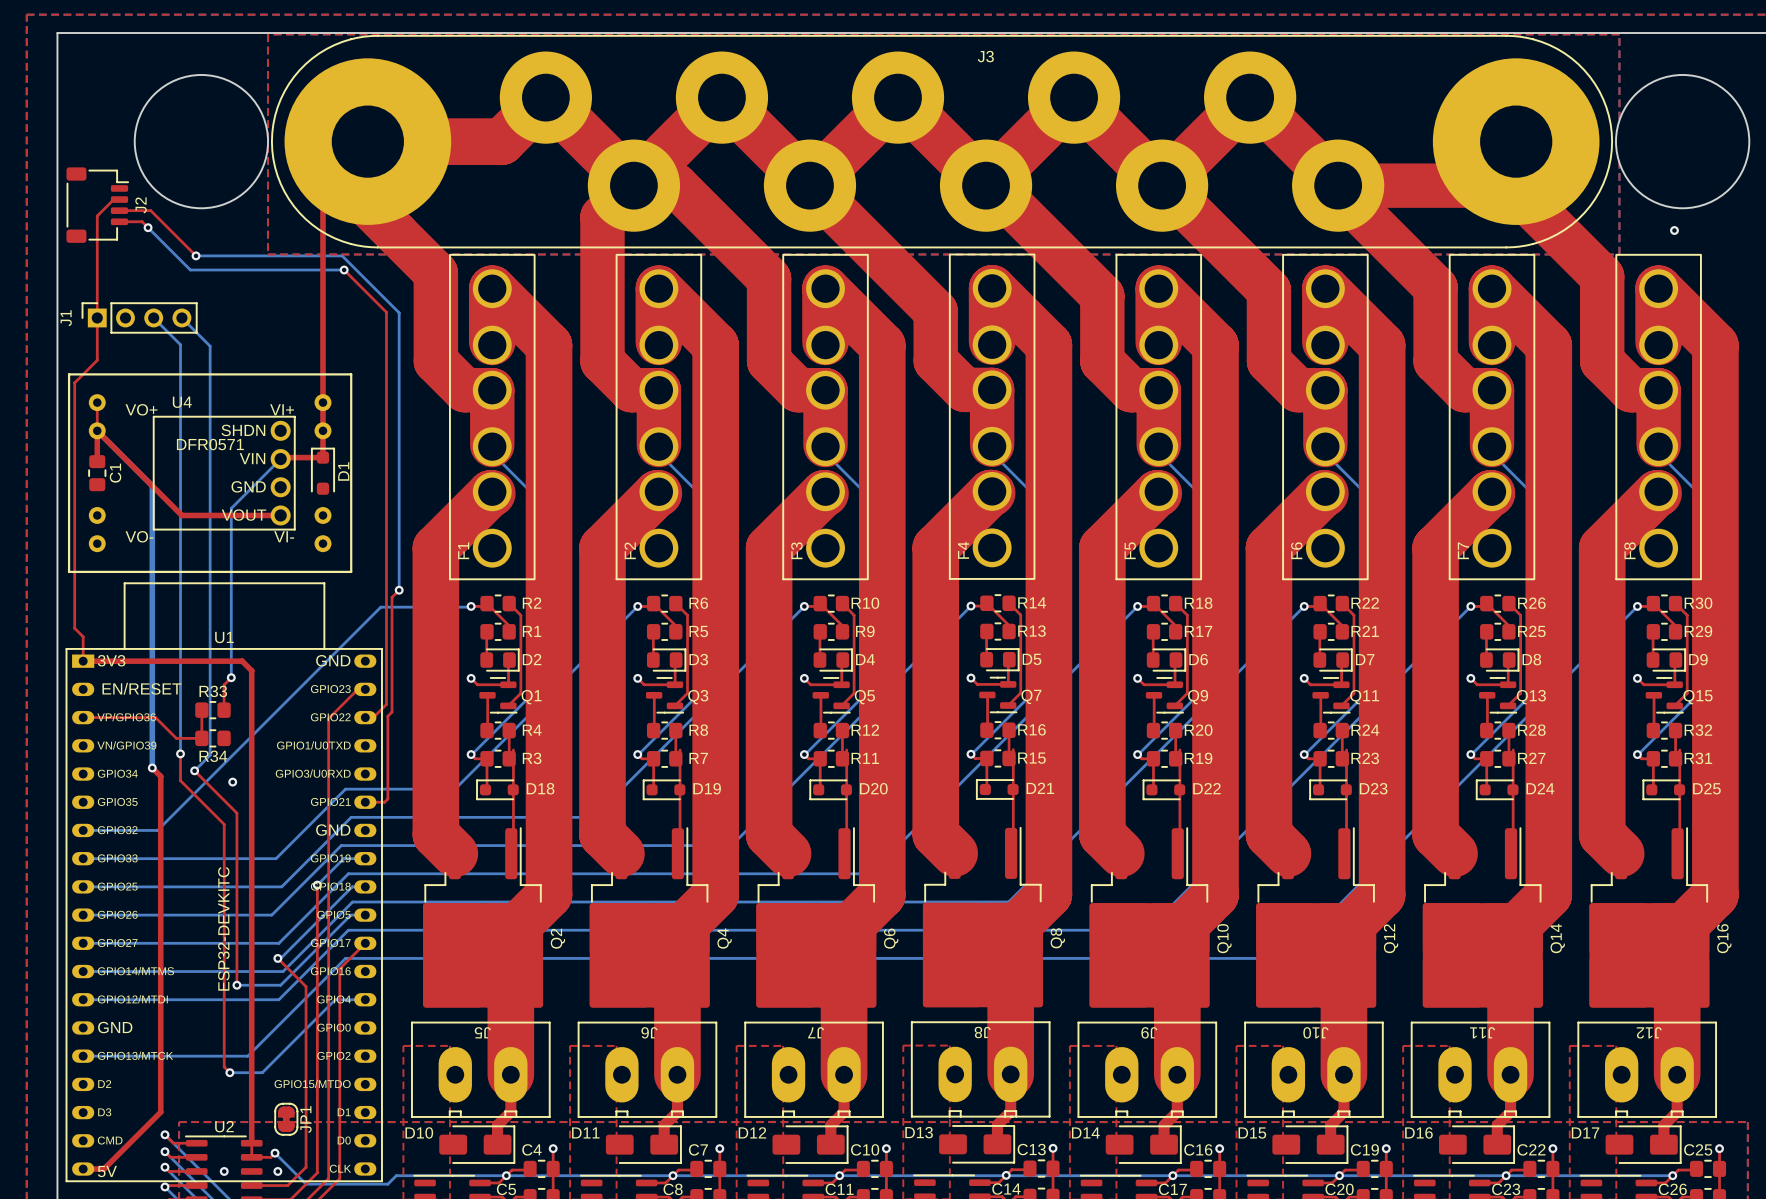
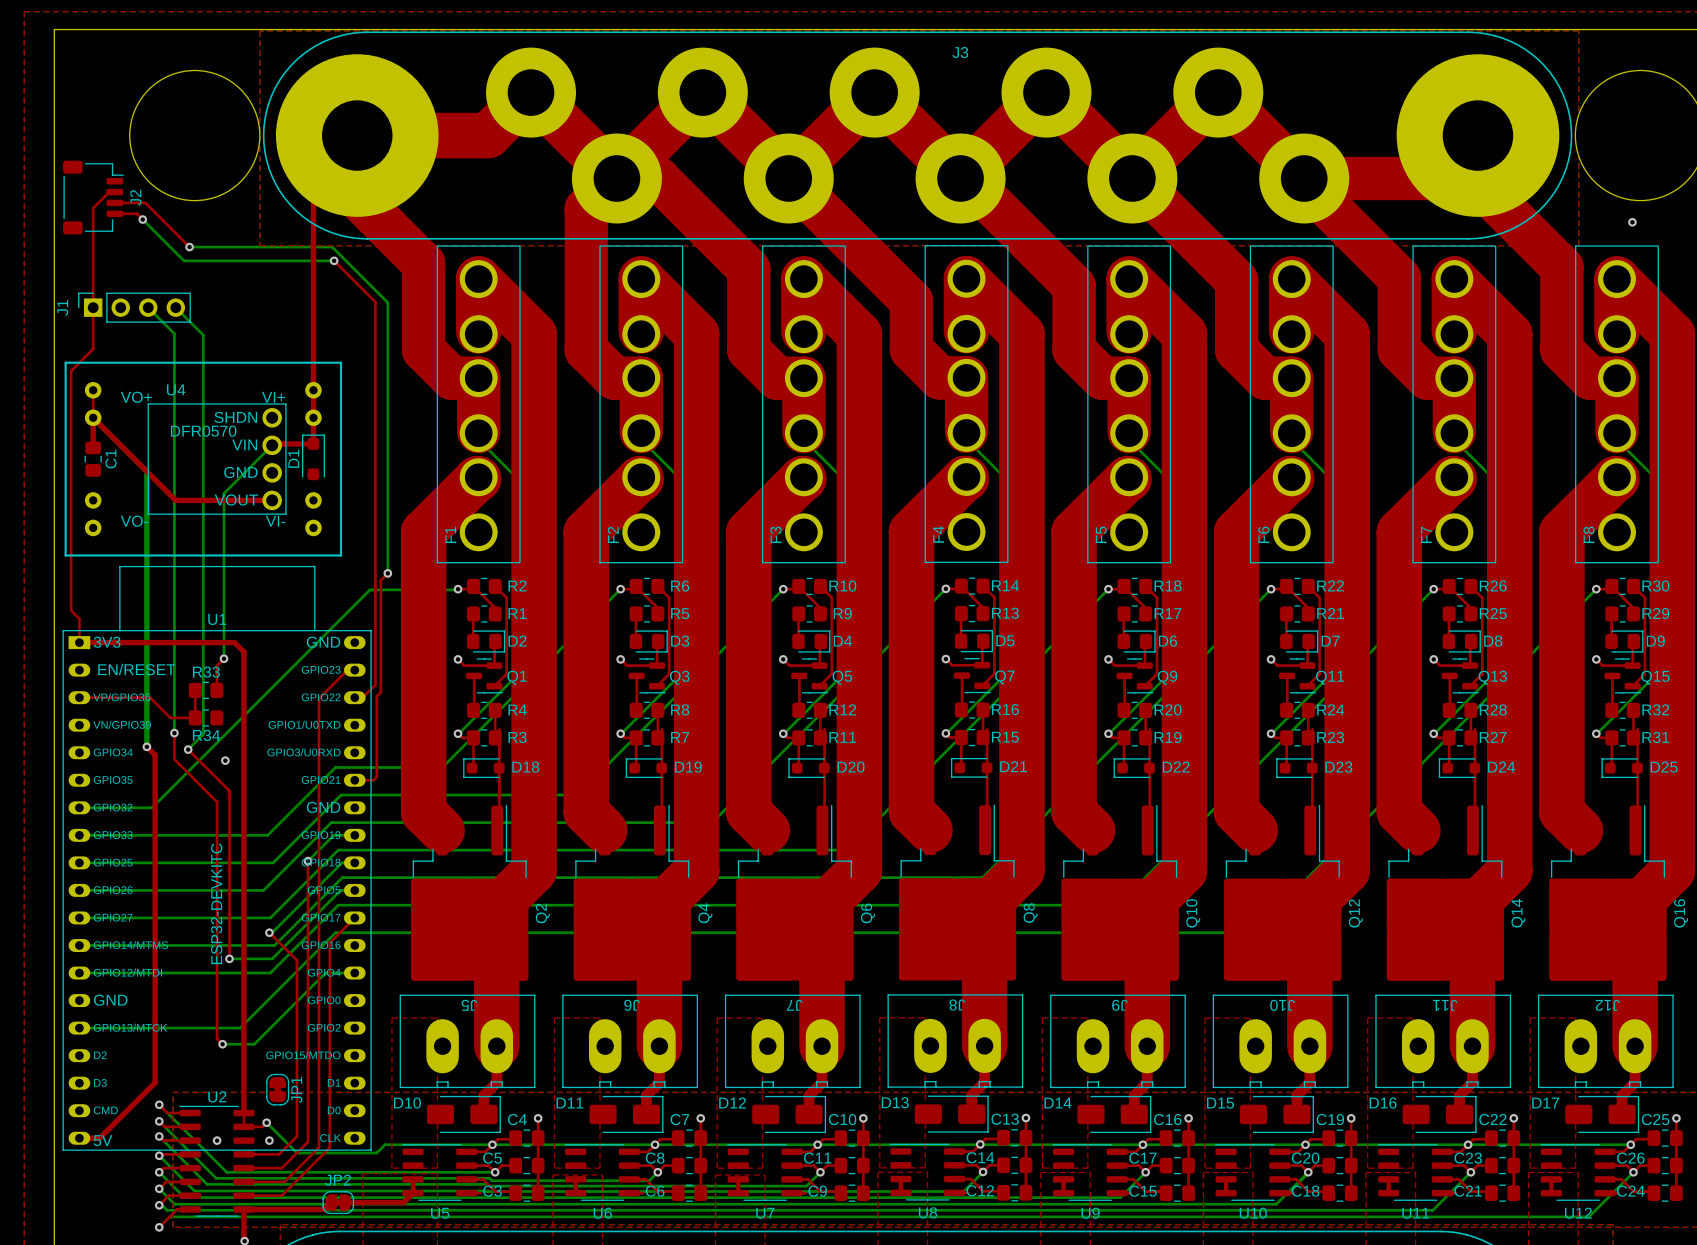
DFR0571 name: DFR0571 (210, 444) -> DFR0570 (203, 431)
D1 name position: D1 (343, 471) -> D1 (293, 458)

